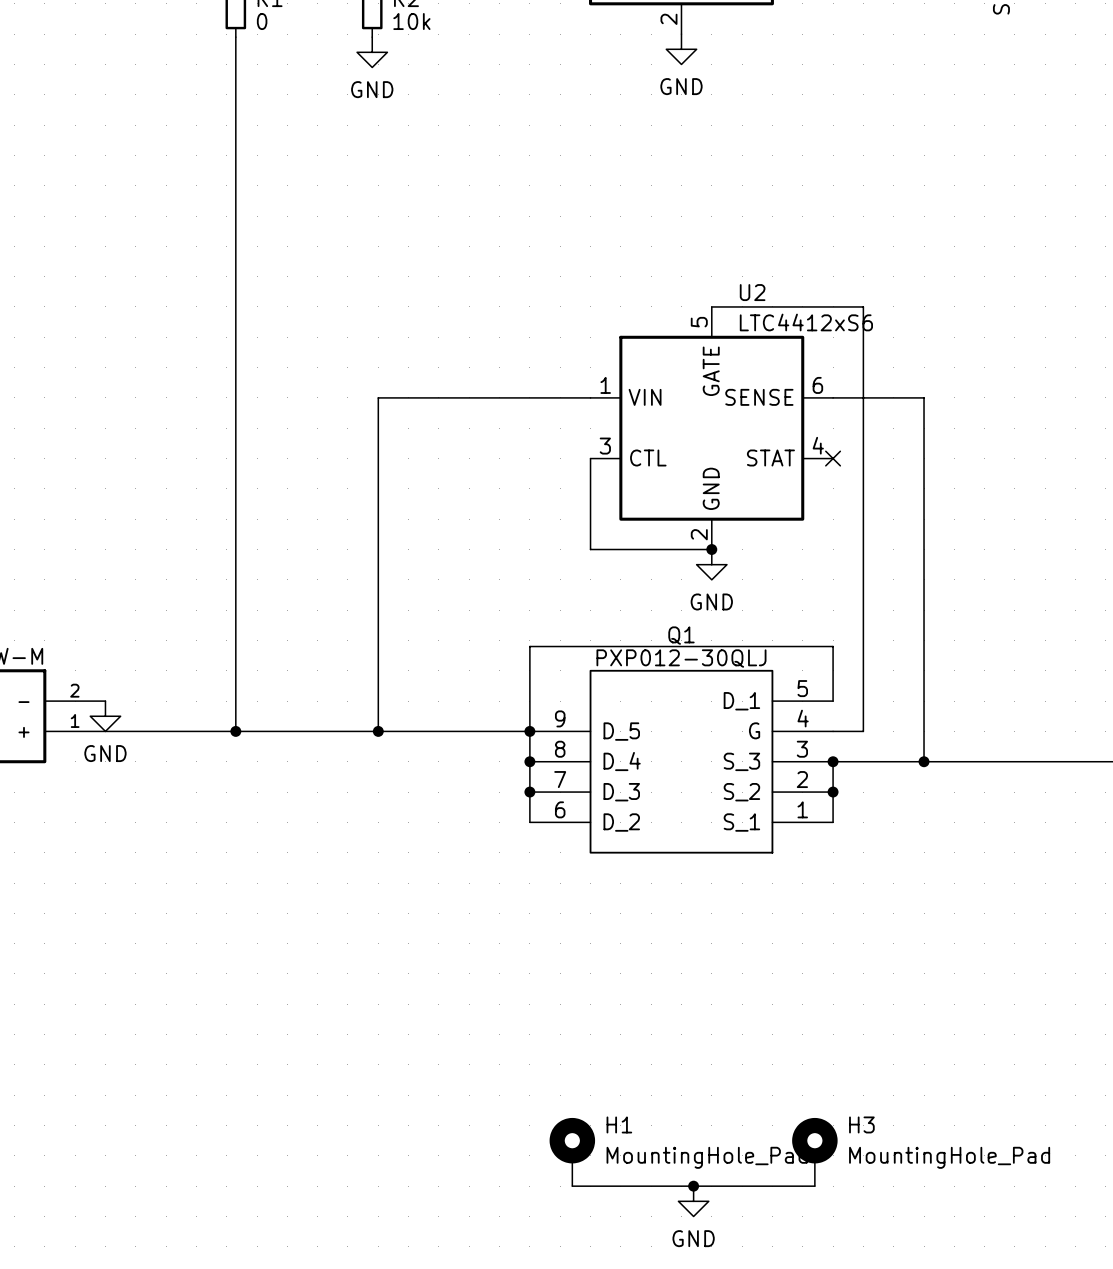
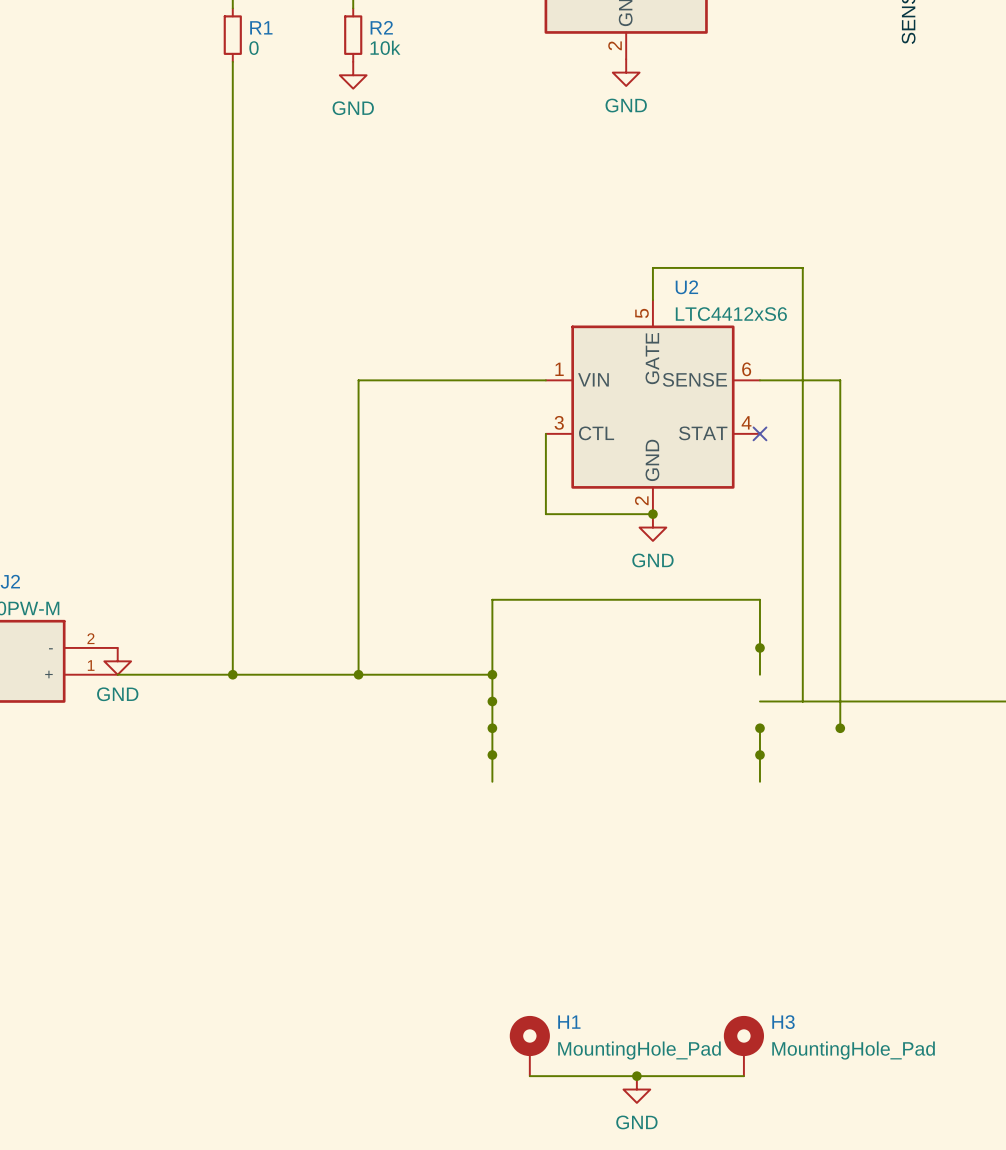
wire: (711, 306) (863, 306) (863, 731) (833, 731) -> (652, 300) (652, 267) (802, 267) (802, 701)
wire: none -> (759, 647) (759, 674)
junction: none -> (759, 647)
Q1: PXP012-30QLJ (681, 761) -> none
wire: (833, 761) (833, 792) -> (759, 755) (759, 781)
junction: (833, 761) -> none
wire: none -> (840, 701) (840, 728)
junction position: (924, 761) -> (840, 728)
wire: none -> (492, 755) (492, 781)
junction: none -> (492, 755)
junction: none -> (759, 755)

